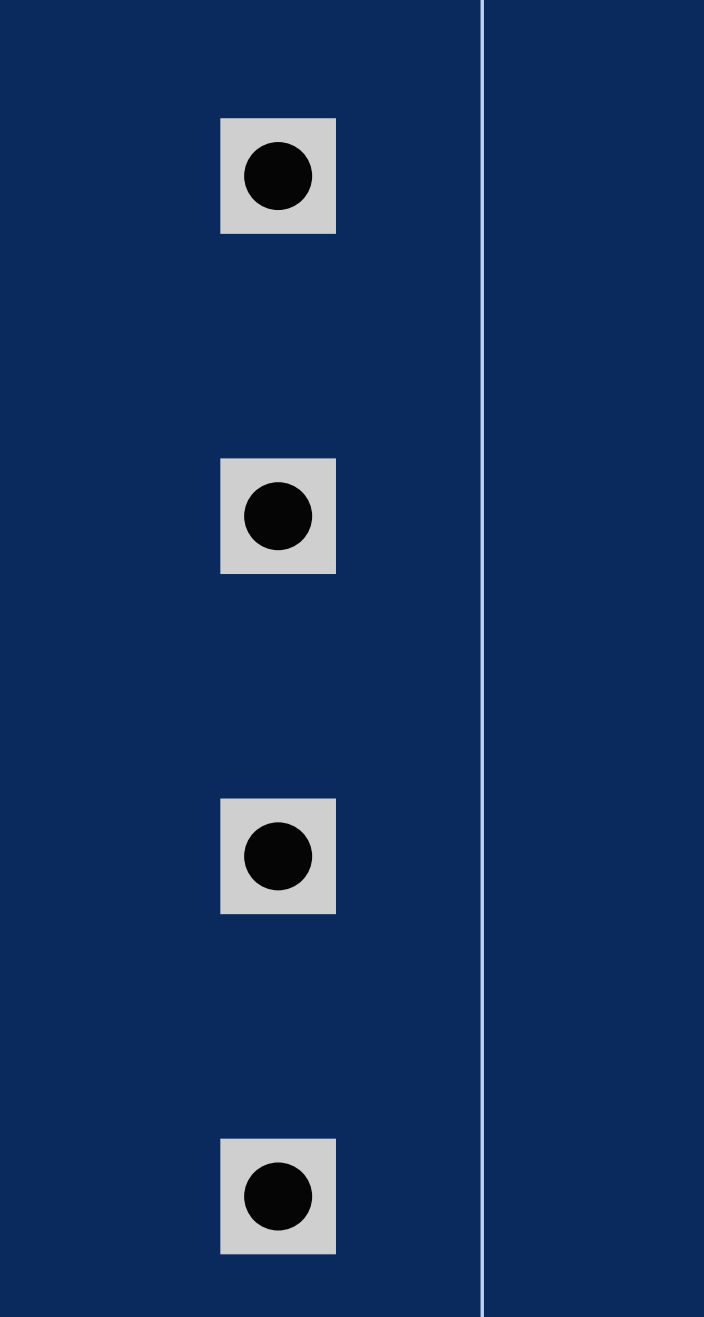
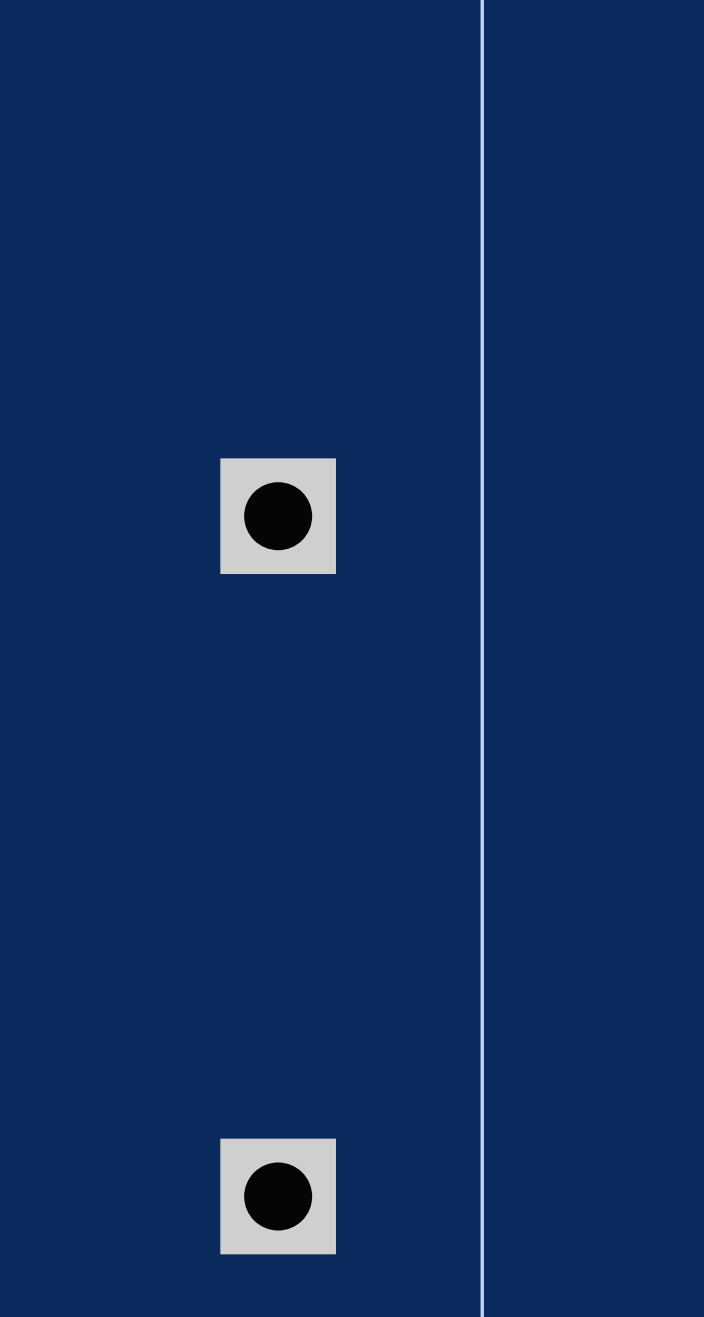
part: (278, 176) -> none
part: (278, 856) -> none

